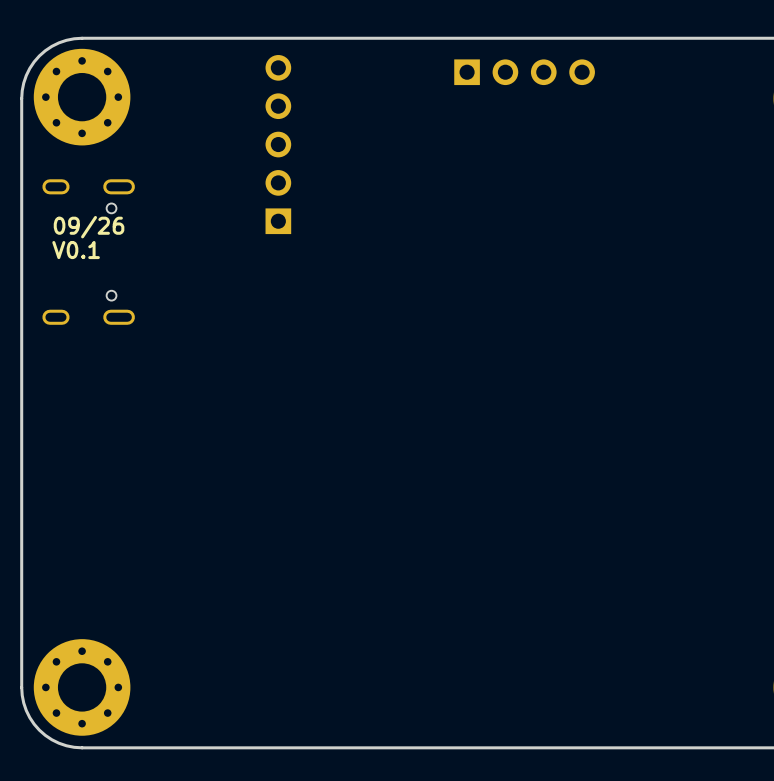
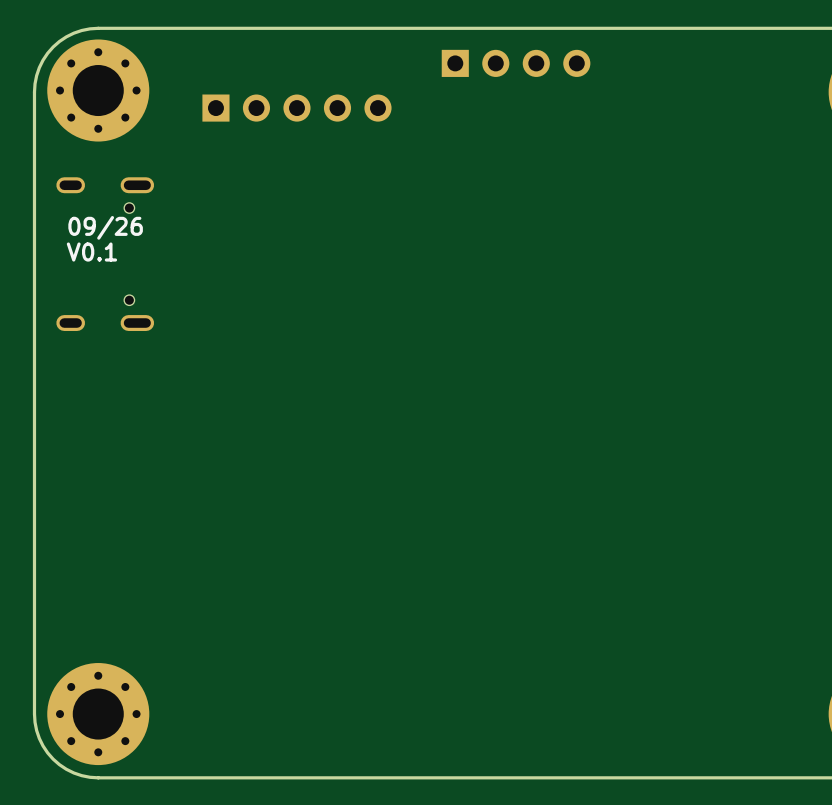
part position: (524, 72) -> (516, 63)
part rotation: 0° (278, 144) -> 90° clockwise (296, 108)

